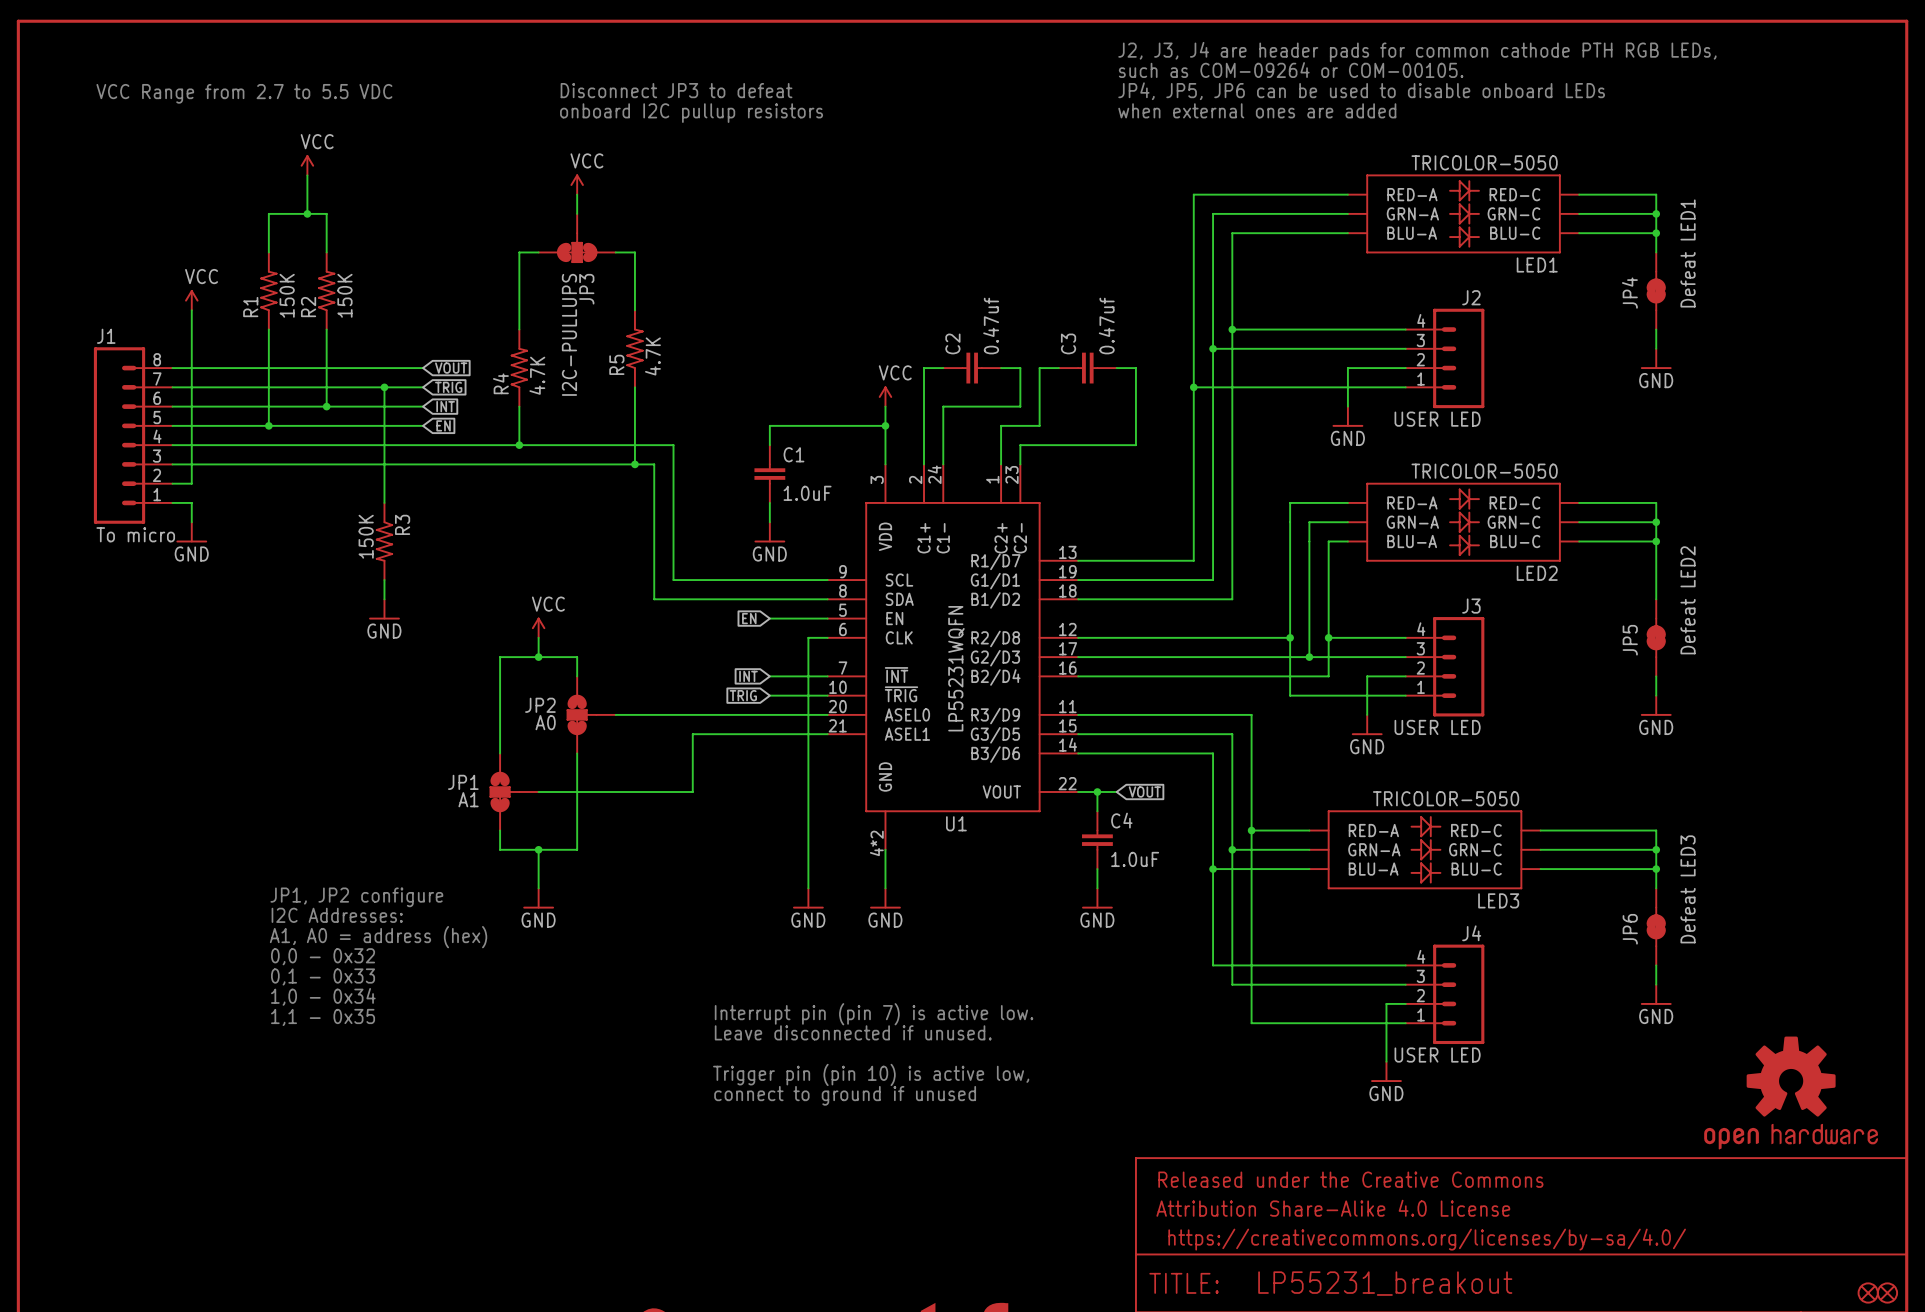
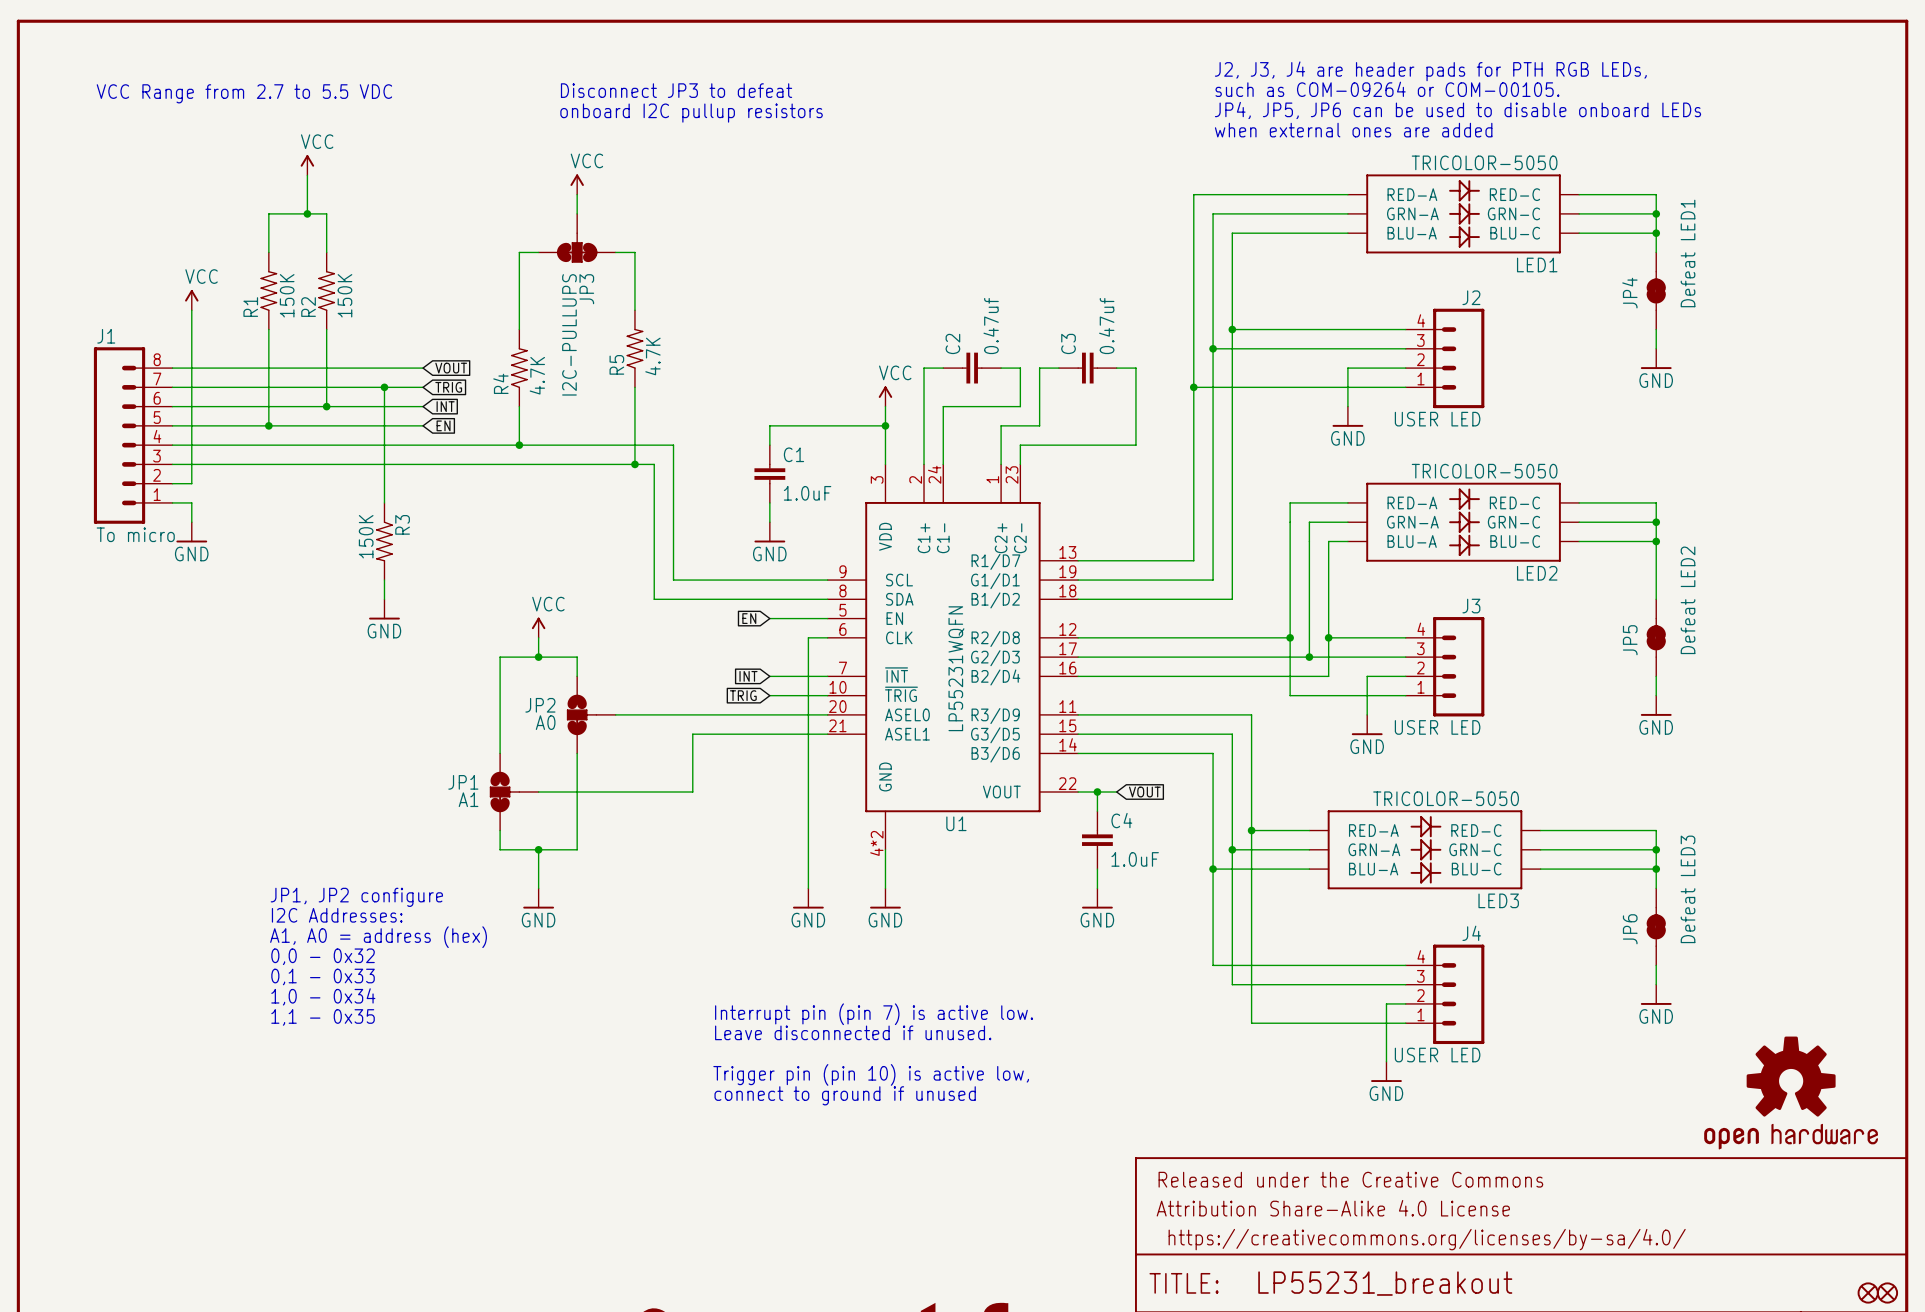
text: J2, J3, J4 are header pads for common cathode PTH RGB LEDs, (1417, 52) -> J2, J3, J4 are header pads for PTH RGB LEDs, (1430, 71)
text position: such as COM-09264 or COM-00105. (1291, 70) -> such as COM-09264 or COM-00105. (1387, 89)
text position: JP4, JP5, JP6 can be used to disable onboard LEDs (1361, 91) -> JP4, JP5, JP6 can be used to disable onboard LEDs (1457, 110)
text position: when external ones are added (1257, 110) -> when external ones are added (1353, 130)

